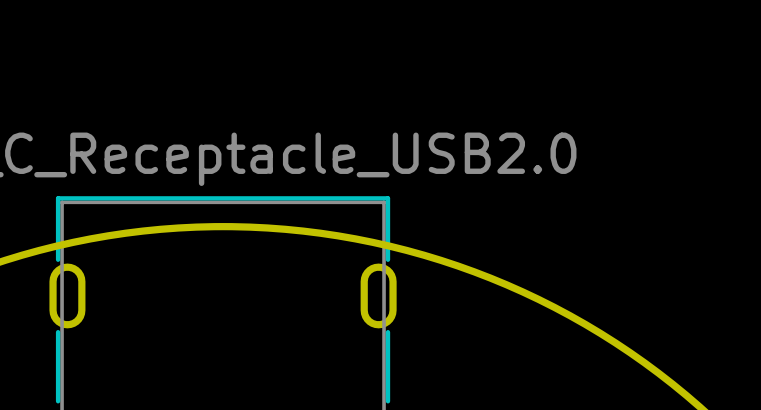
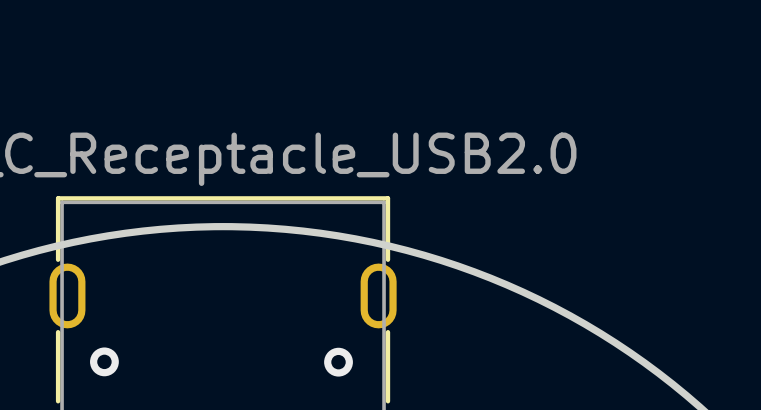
via: none -> (104, 361)
via: none -> (338, 362)

